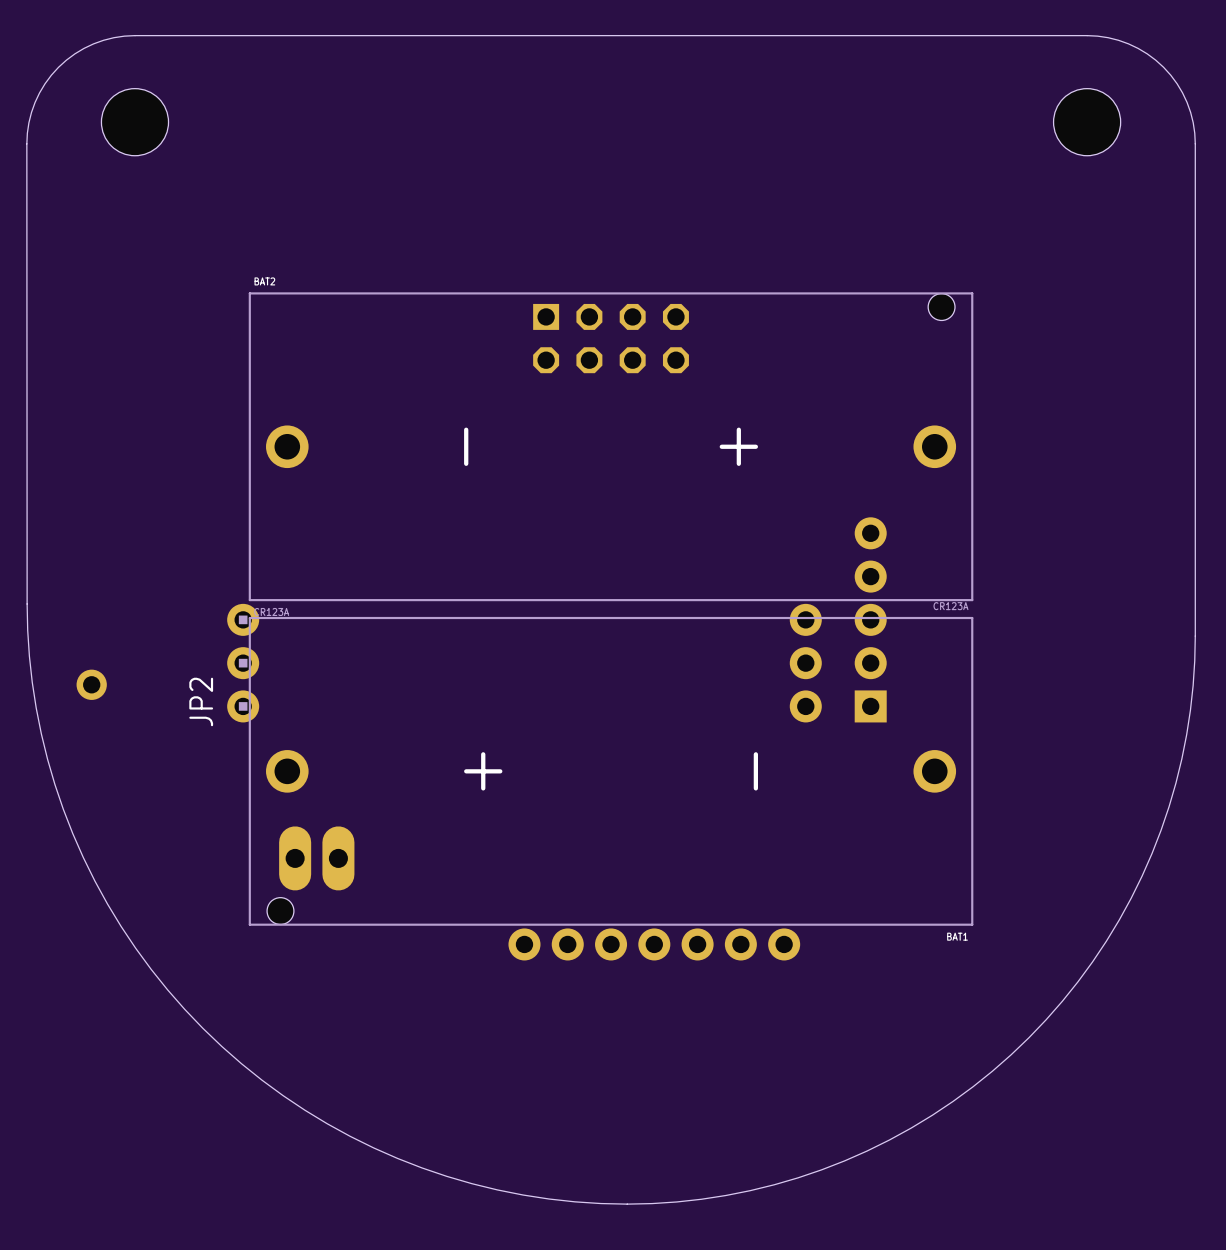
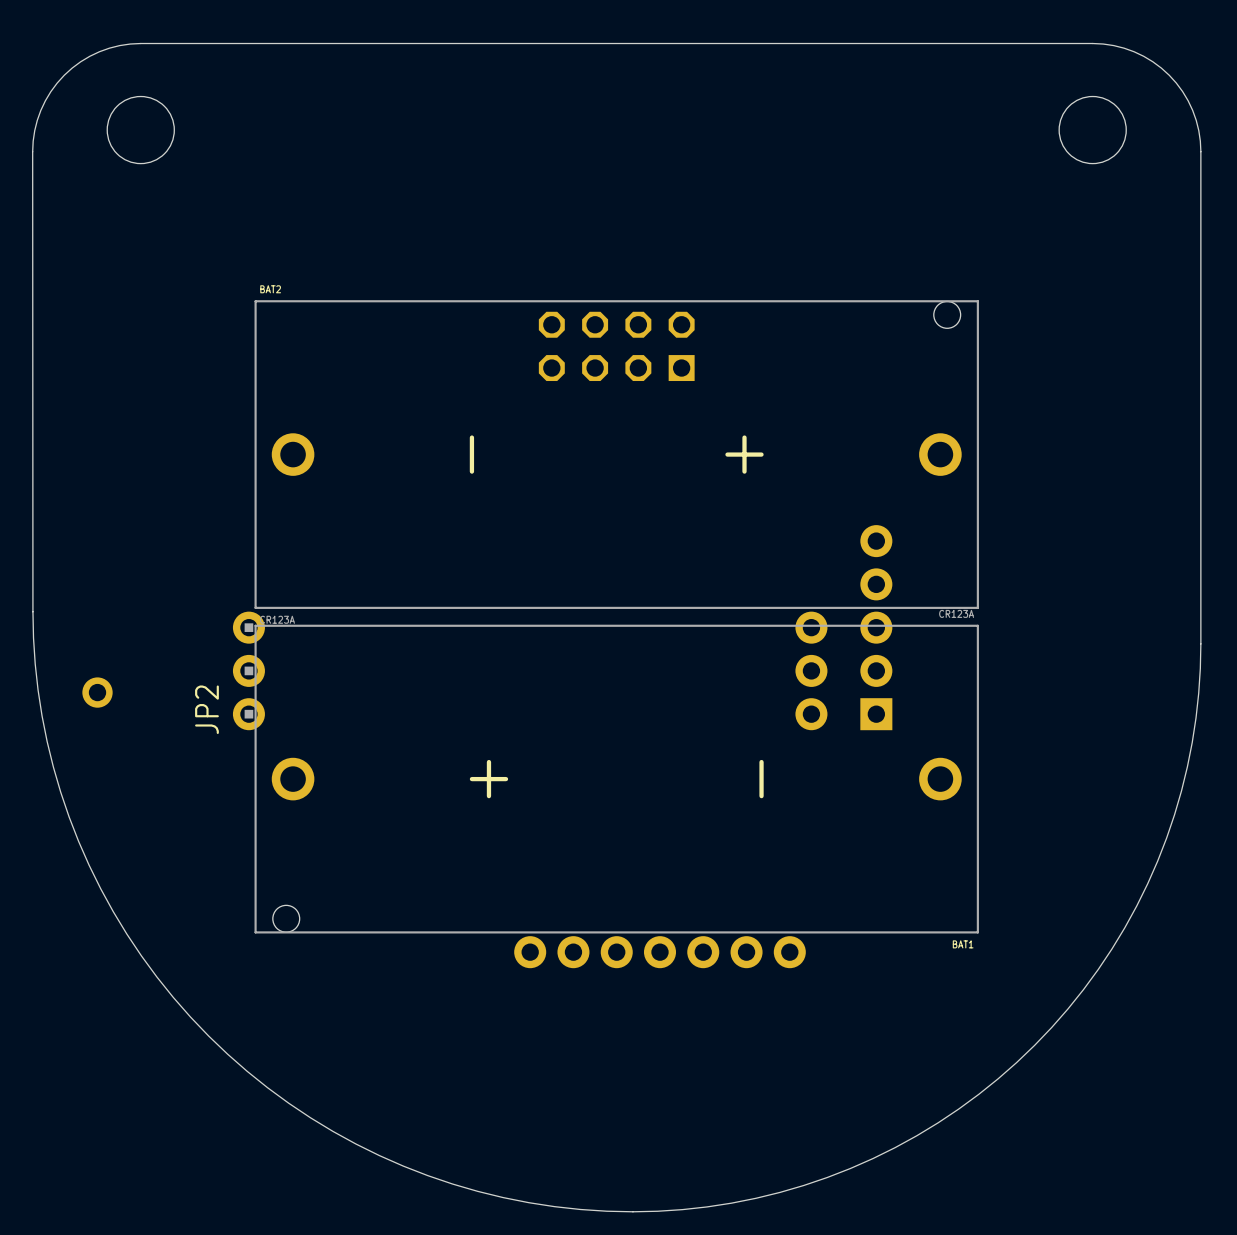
part rotation: 0° (611, 338) -> 180° (616, 346)
part: (316, 858) -> none

